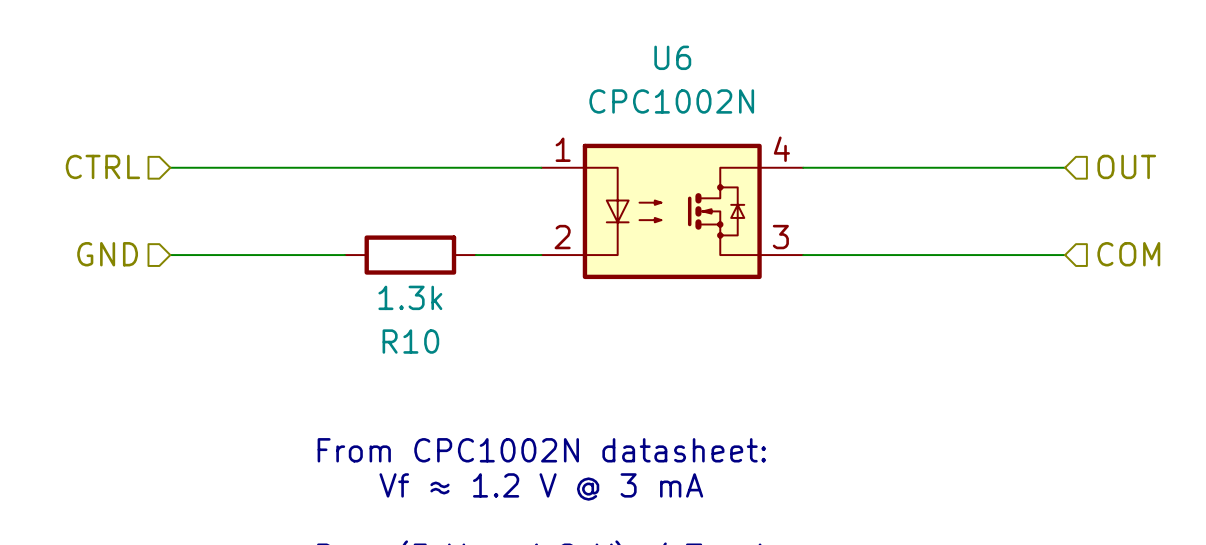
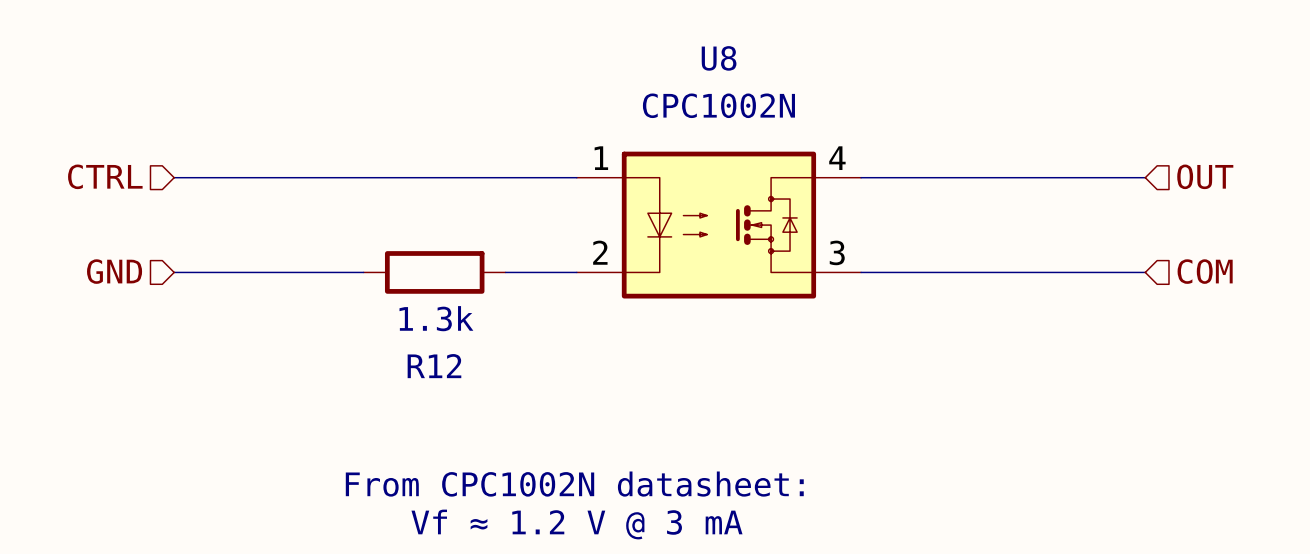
U6 name: U6 (672, 57) -> U8 (719, 58)
R10 name: R10 (410, 341) -> R12 (434, 366)

